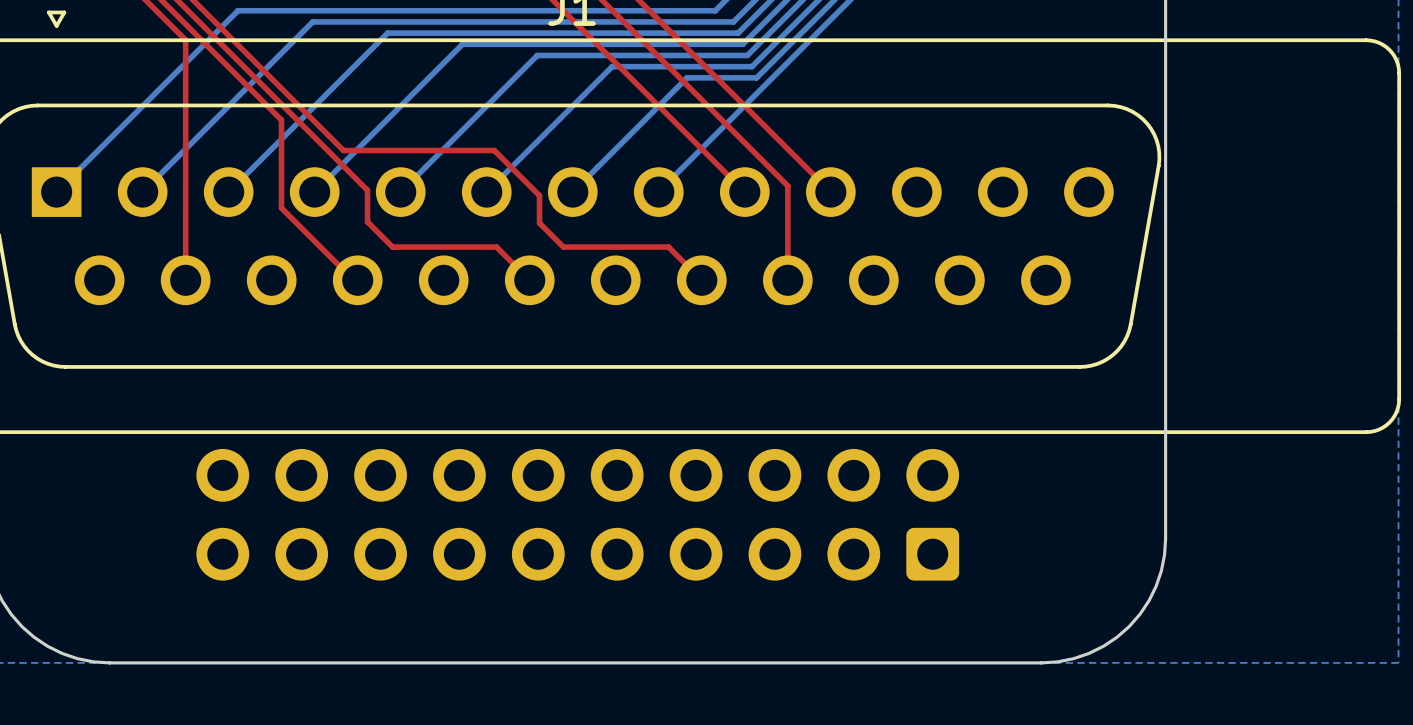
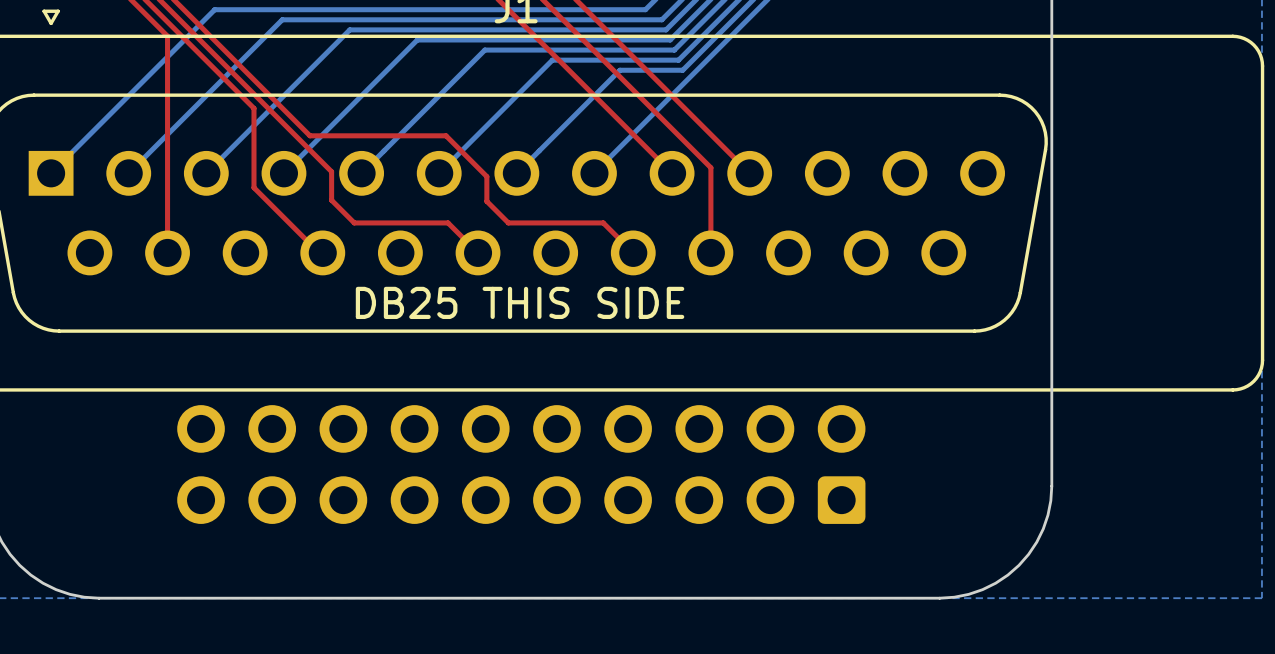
text: none -> DB25 THIS SIDE (520, 302)

